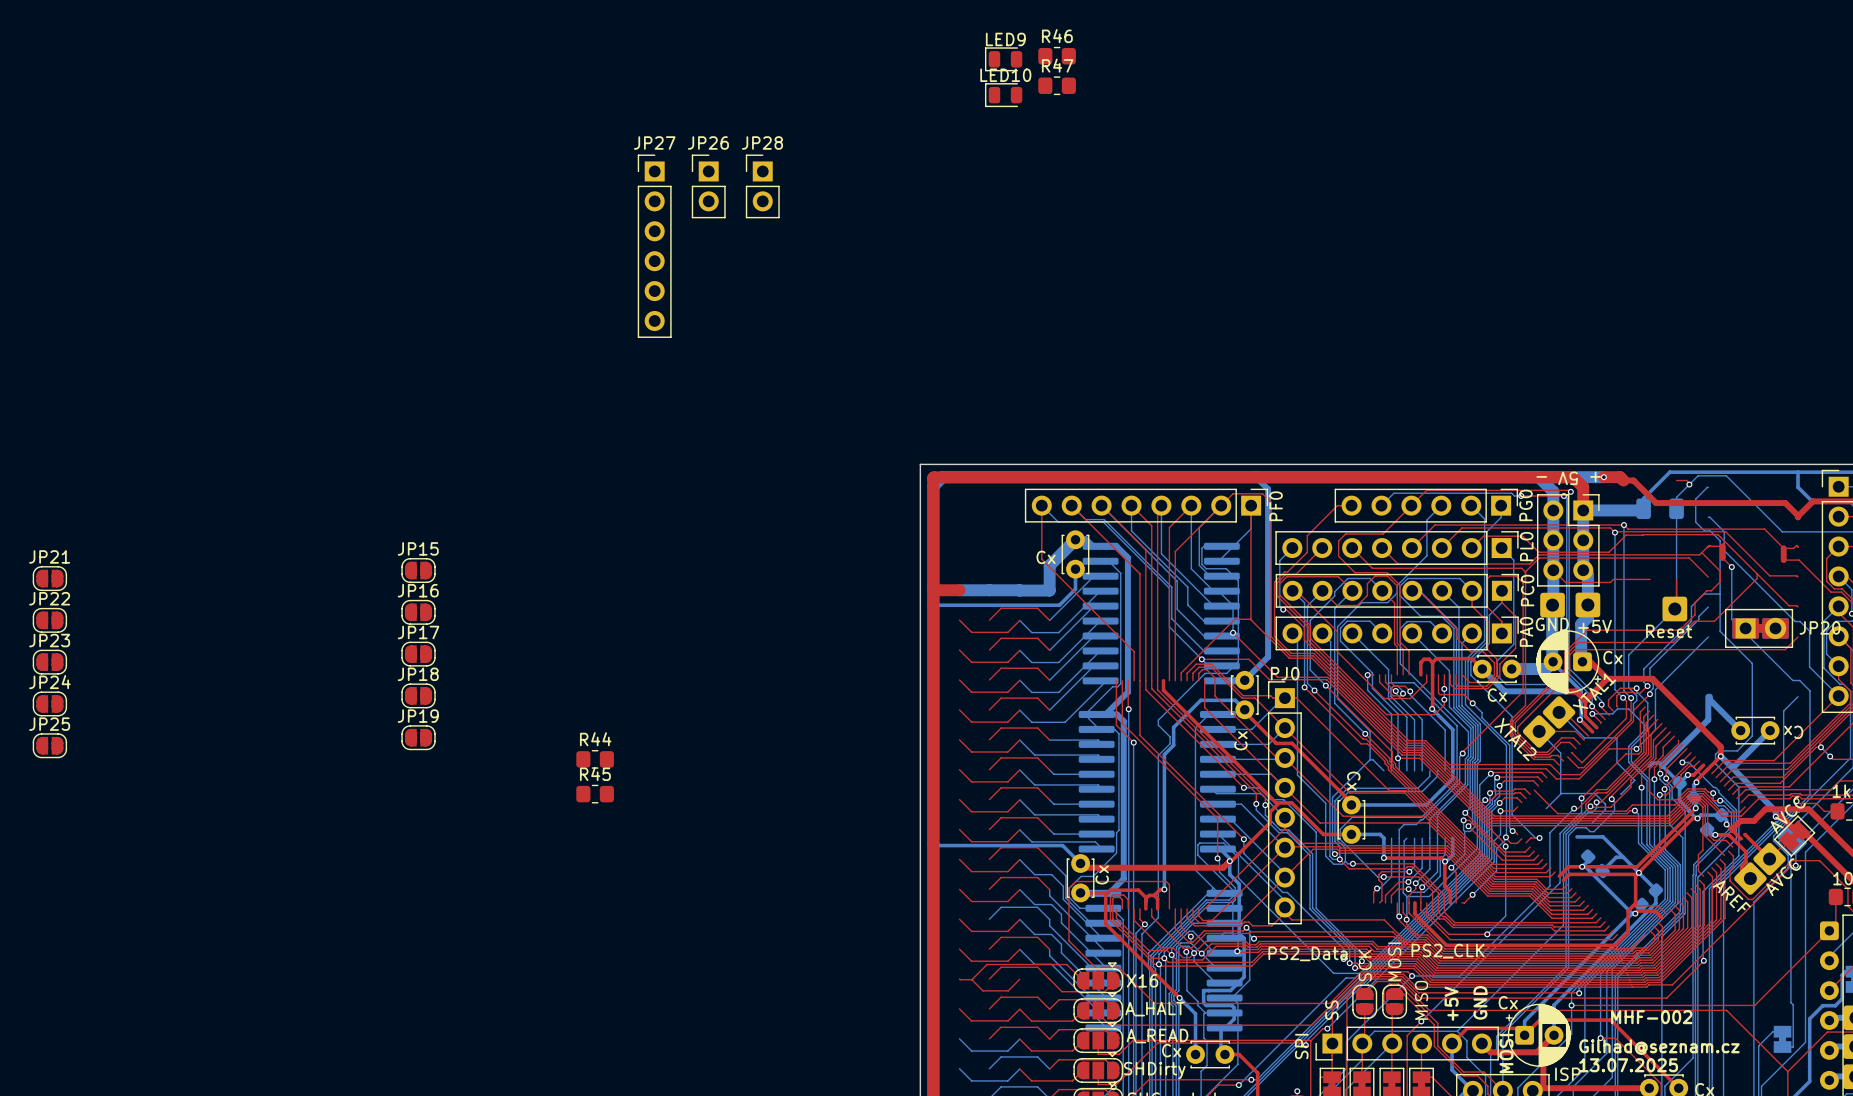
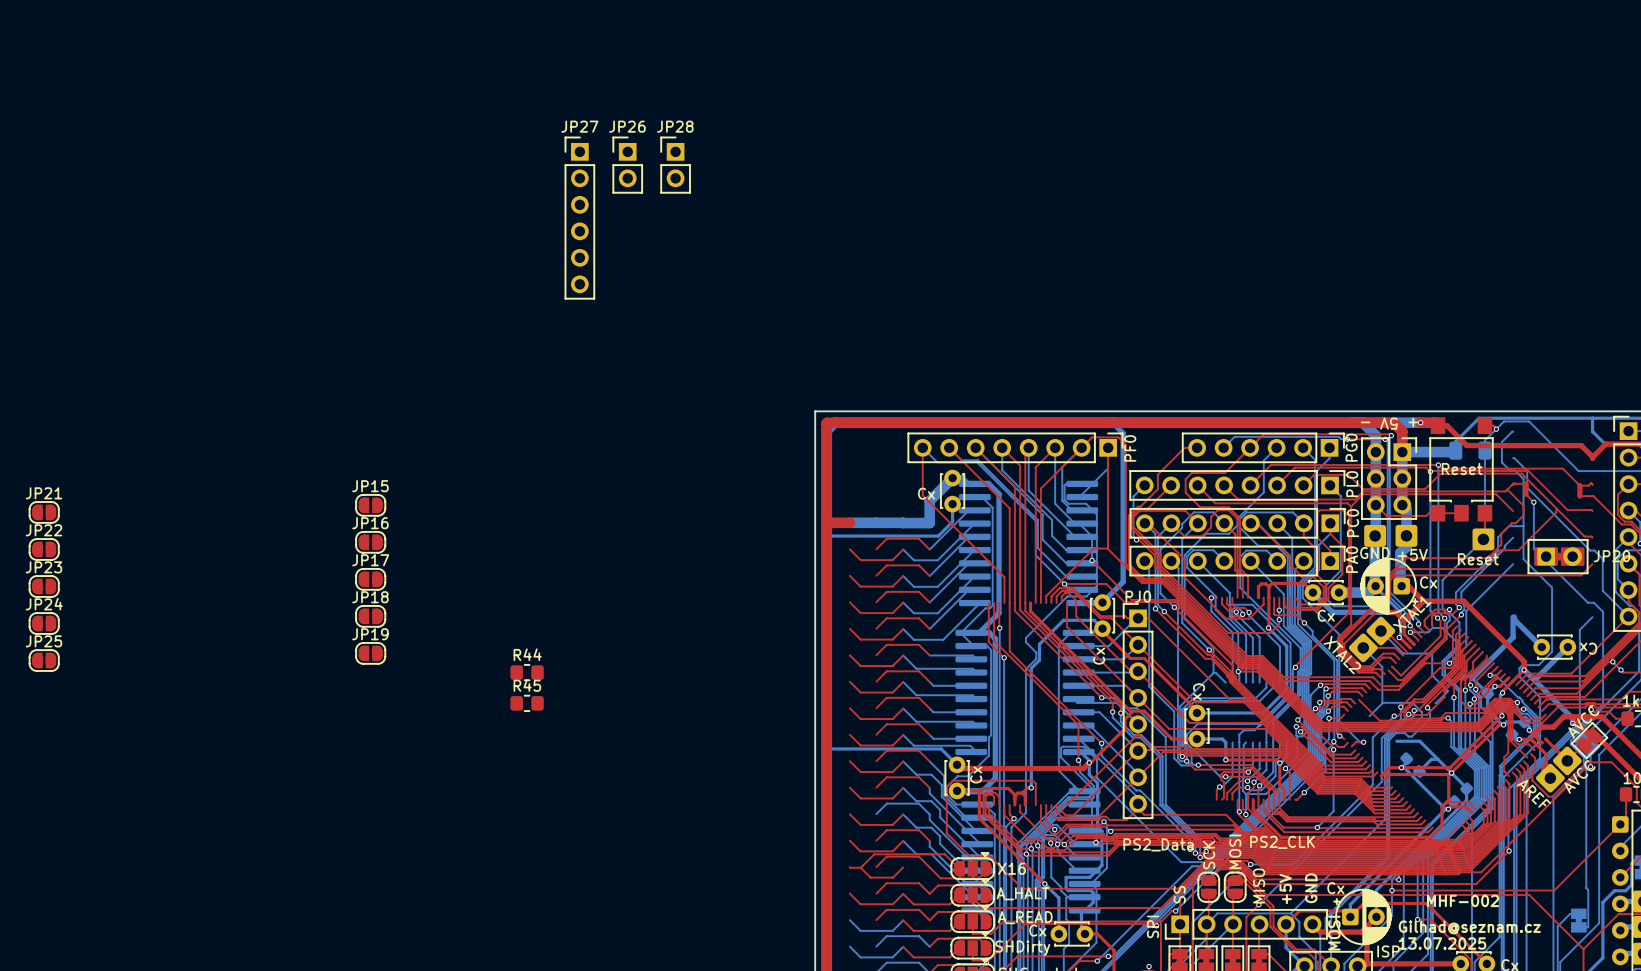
R46: (1057, 56) -> none
LED9: (1003, 59) -> none
R47: (1057, 85) -> none
LED10: (1003, 95) -> none
part: none -> Reset (1461, 469)

